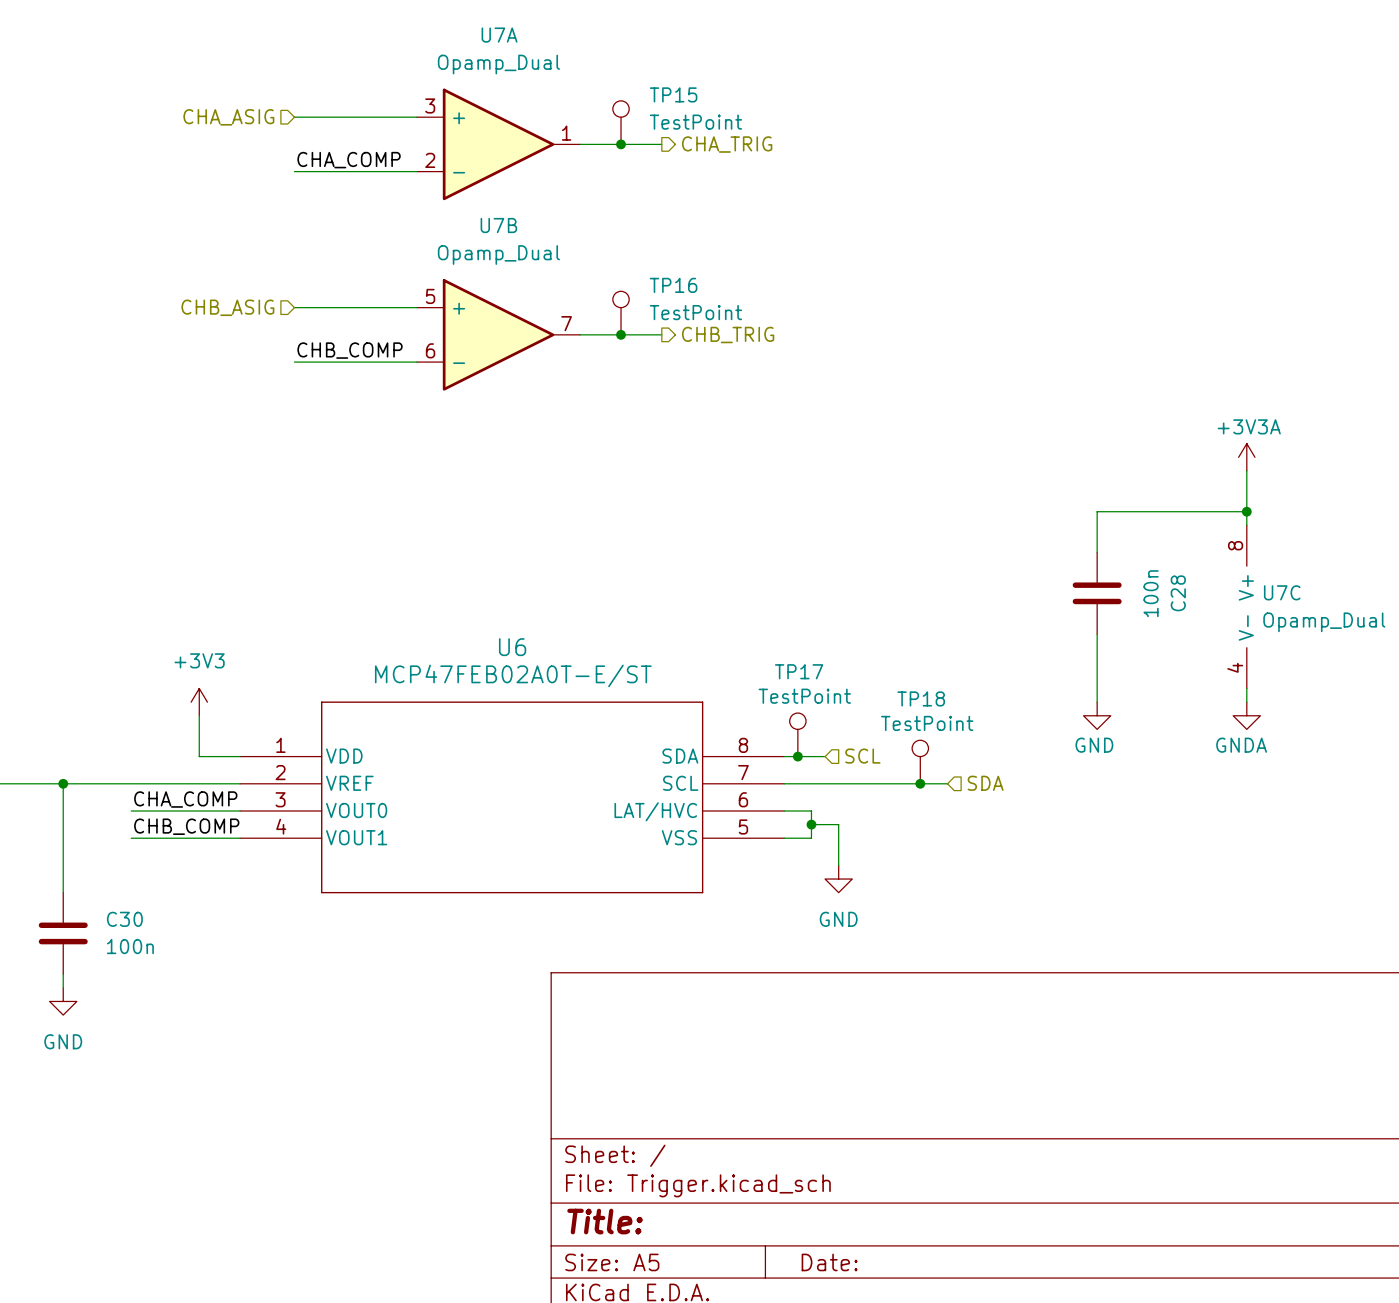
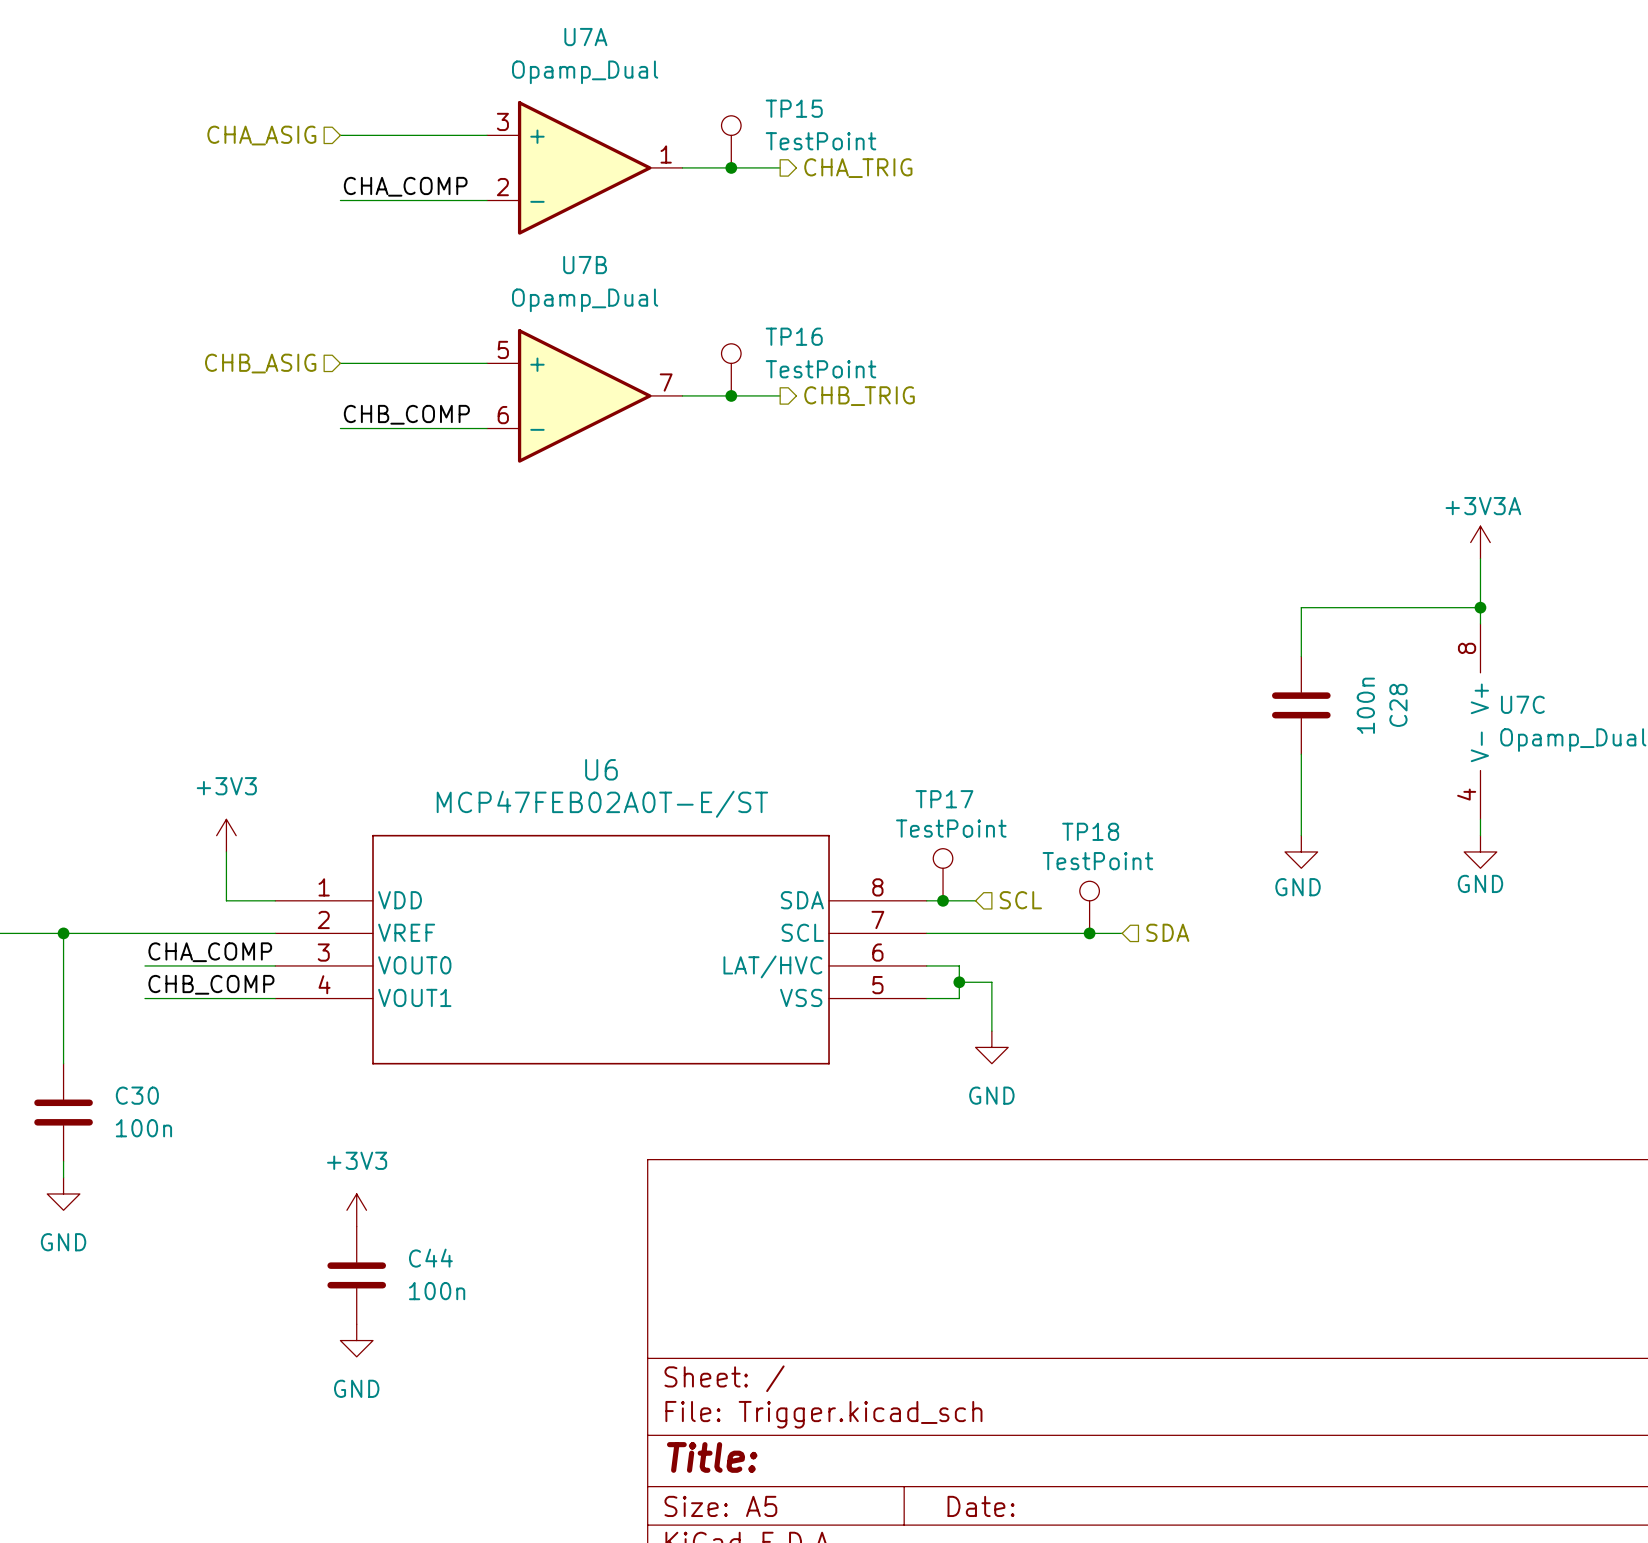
power symbol: GNDA (1246, 715) -> GND (1480, 851)
power symbol: none -> +3V3 (356, 1210)
C44: none -> 100n (356, 1275)
power symbol: none -> GND (356, 1340)

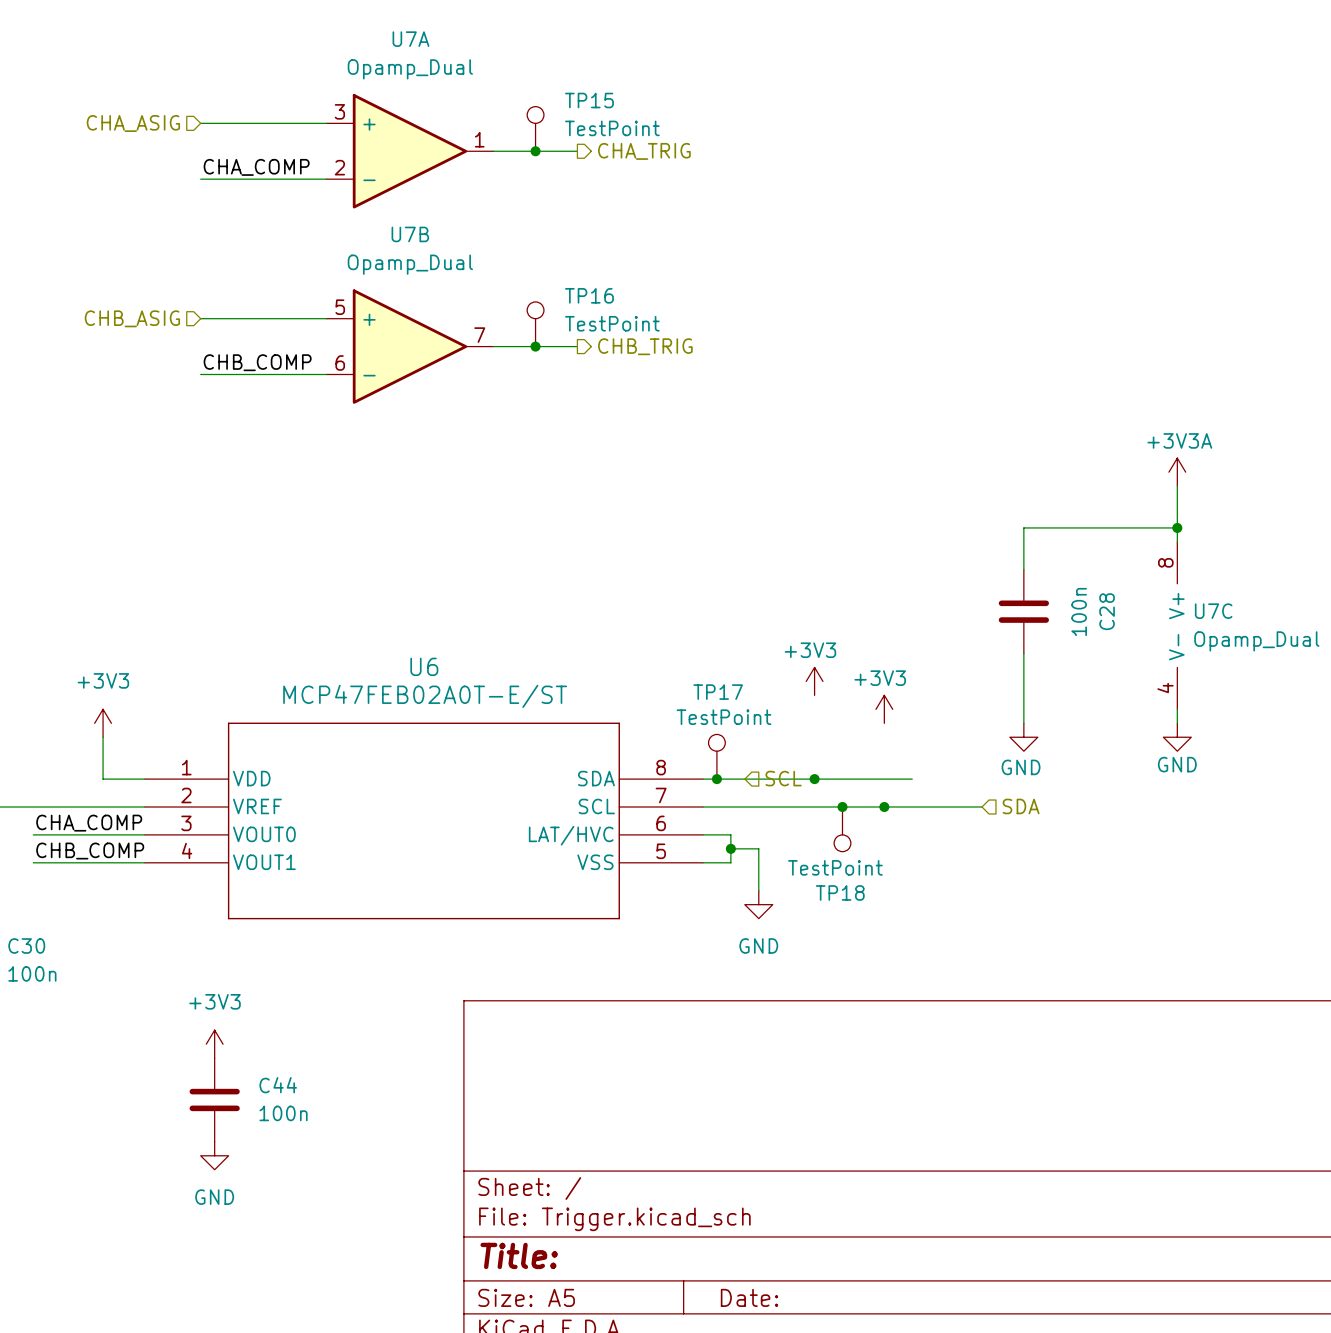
power symbol: none -> +3V3 (814, 681)
power symbol: none -> +3V3 (884, 709)
TP18 rotation: 0° (1089, 891) -> 180° (842, 843)
wire: none -> (744, 779) (912, 779)
junction: none -> (814, 779)
TP18 position: (1089, 907) -> (842, 829)
hierarchical label position: SDA (1167, 932) -> SDA (1021, 806)
wire: none -> (870, 807) (982, 807)
junction: none -> (884, 807)

